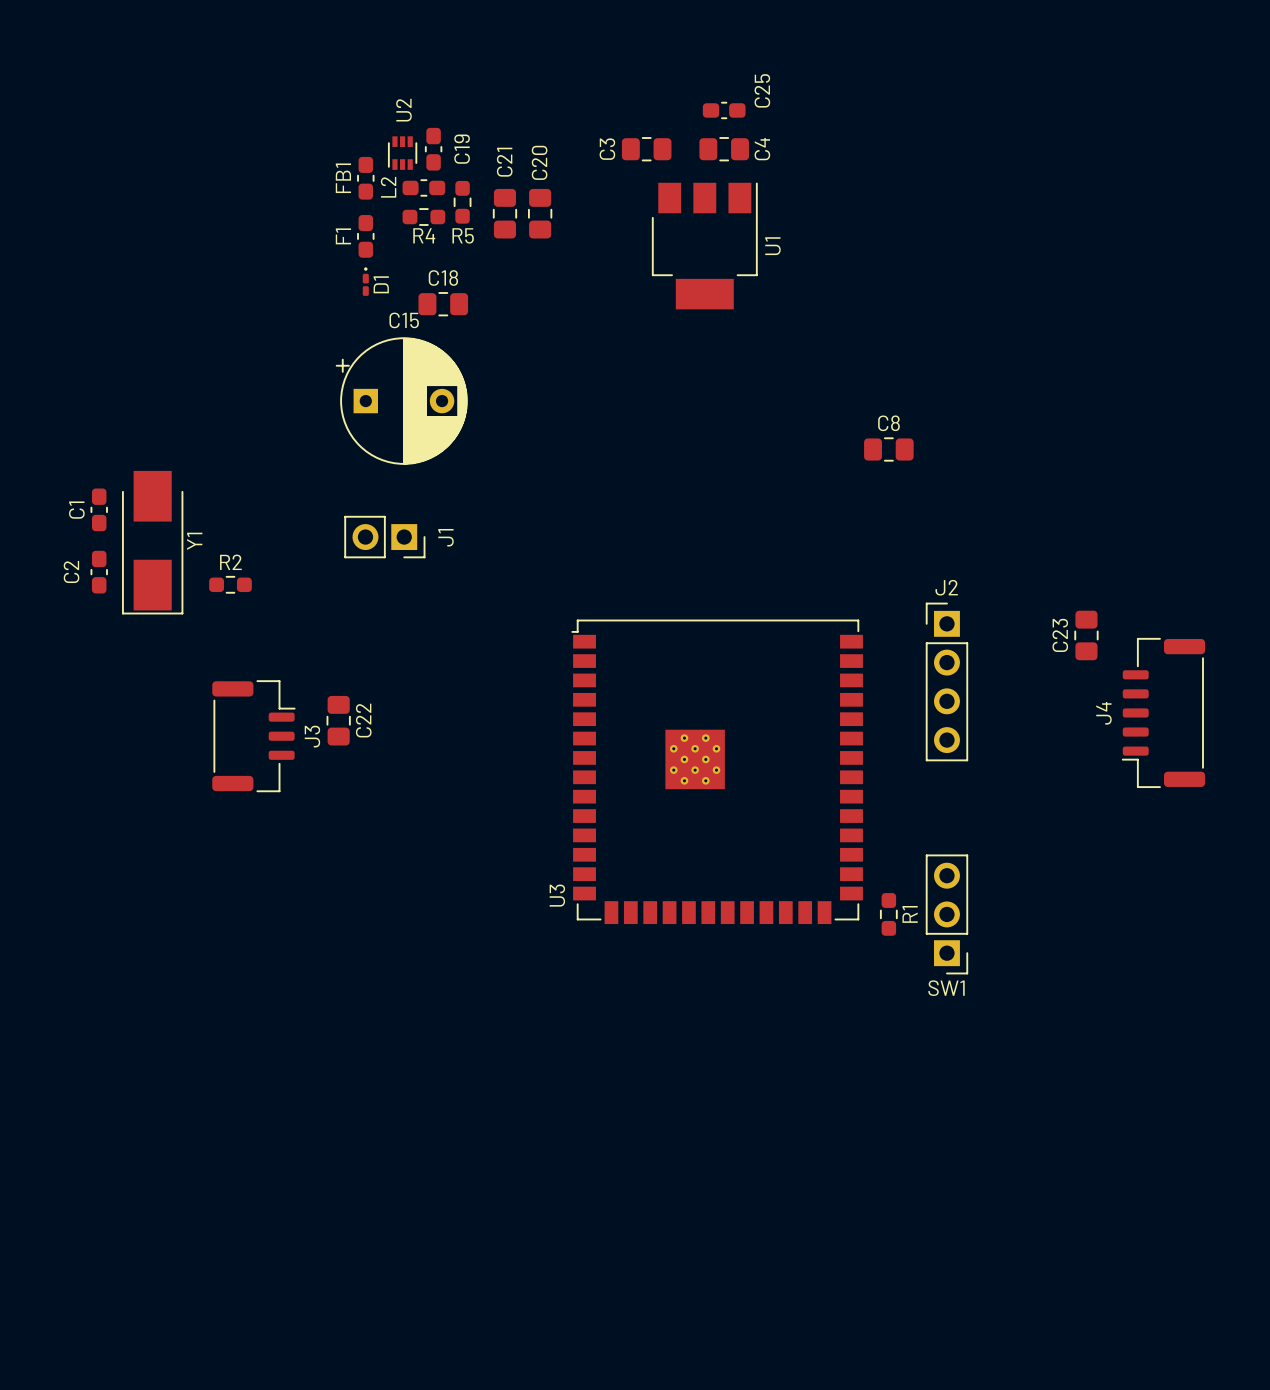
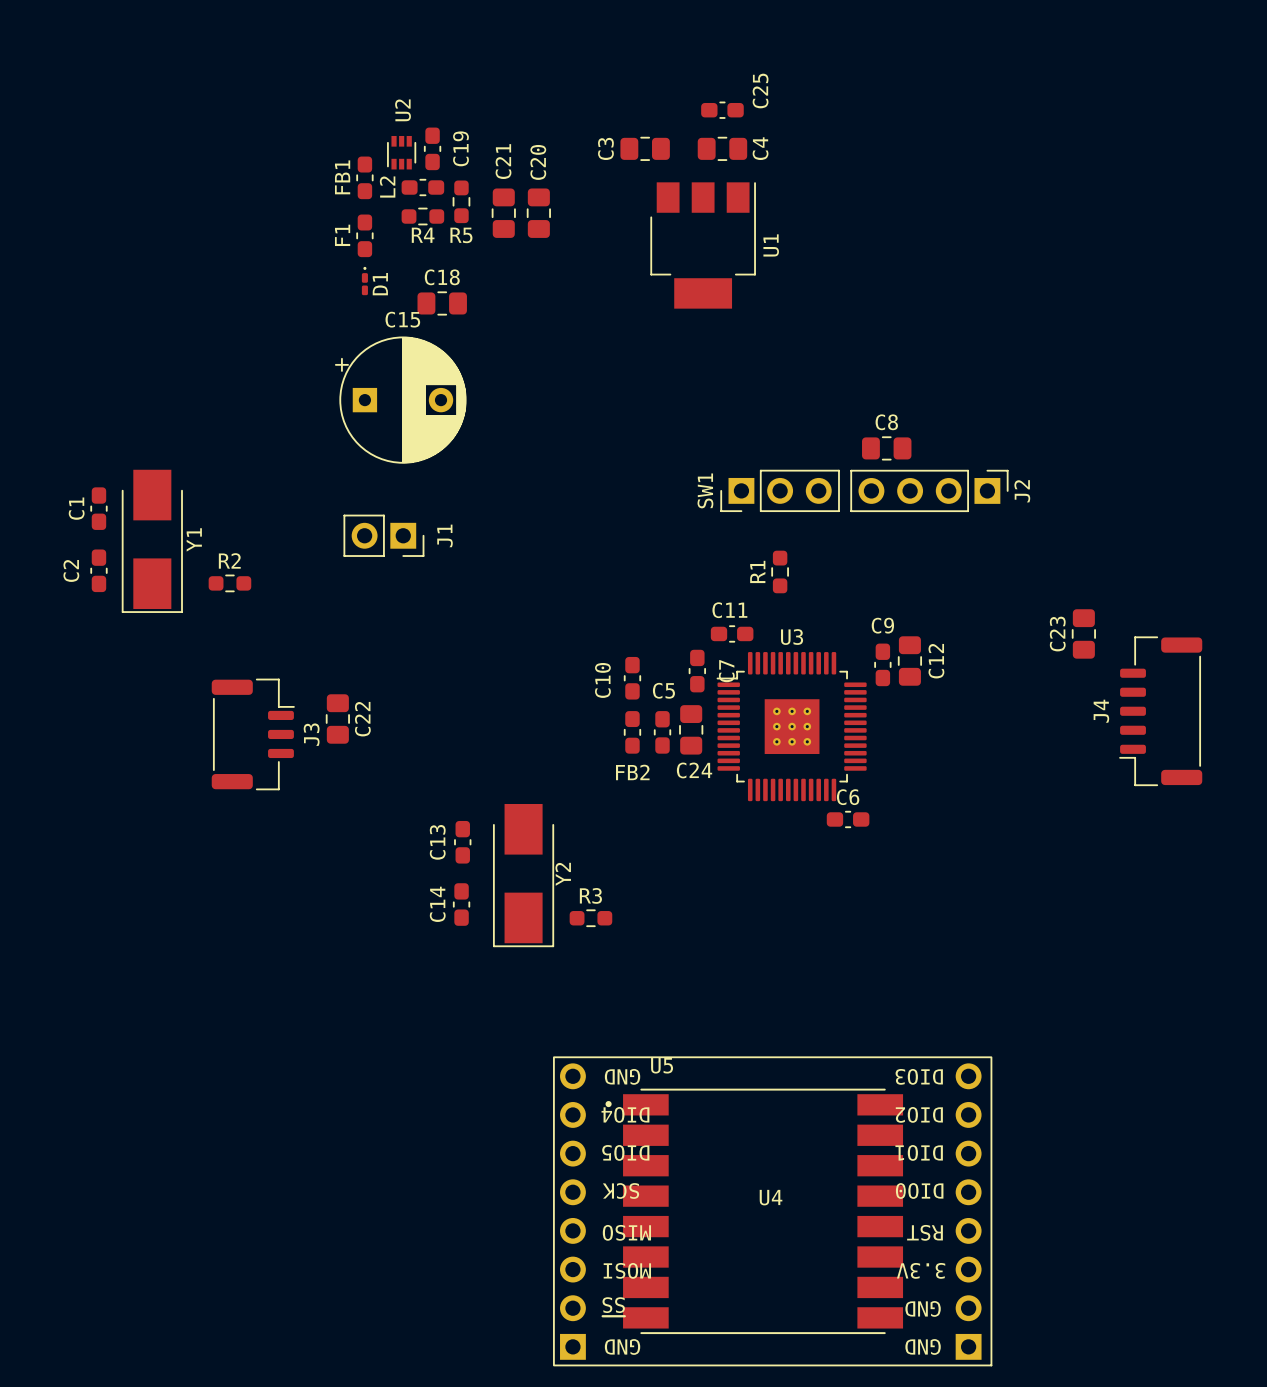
U3 footprint: [571, 619, 863, 925] -> [716, 652, 867, 802]
C11: none -> (732, 633)
C12: none -> (909, 661)
C9: none -> (882, 664)
C7: none -> (697, 671)
C10: none -> (632, 678)
J2 rotation: 0° (946, 681) -> 90° clockwise (929, 490)
J2 position: (946, 681) -> (929, 490)
C24: none -> (691, 729)
FB2: none -> (632, 732)
C5: none -> (662, 732)
C6: none -> (848, 819)
C13: none -> (462, 842)
Y2: none -> (523, 875)
U3 name position: U3 (557, 895) -> U3 (792, 637)
C14: none -> (461, 904)
R1 position: (888, 914) -> (780, 571)
R1 name position: R1 (910, 914) -> R1 (757, 571)
SW1 rotation: 0° (946, 914) -> 90° clockwise (780, 490)
SW1 position: (946, 914) -> (780, 490)
R3: none -> (590, 918)
U5: none -> (754, 1211)
U4: none -> (772, 1211)

